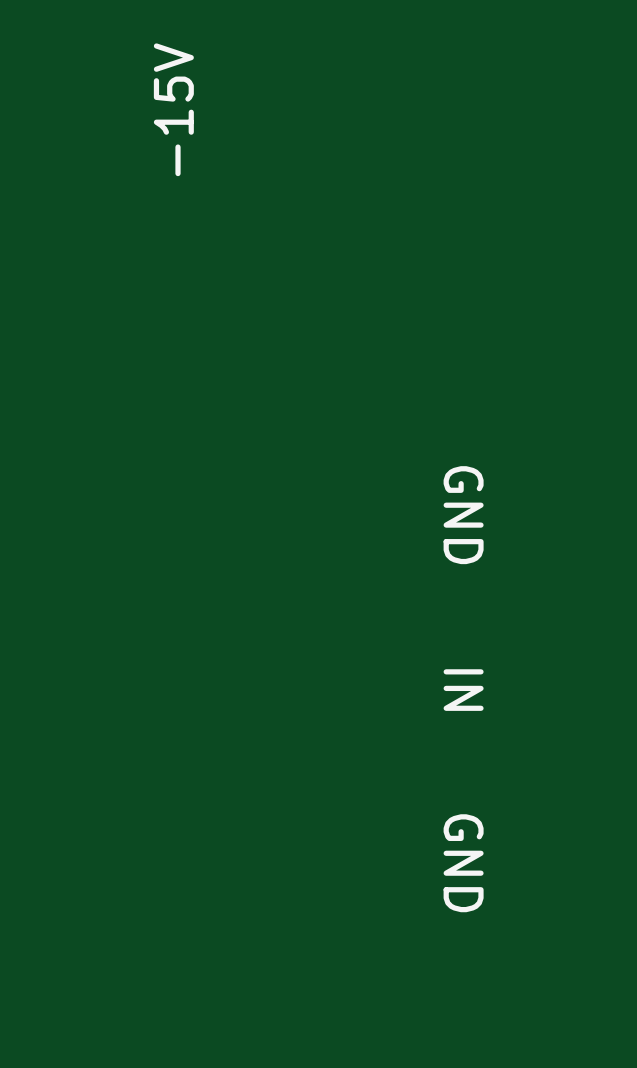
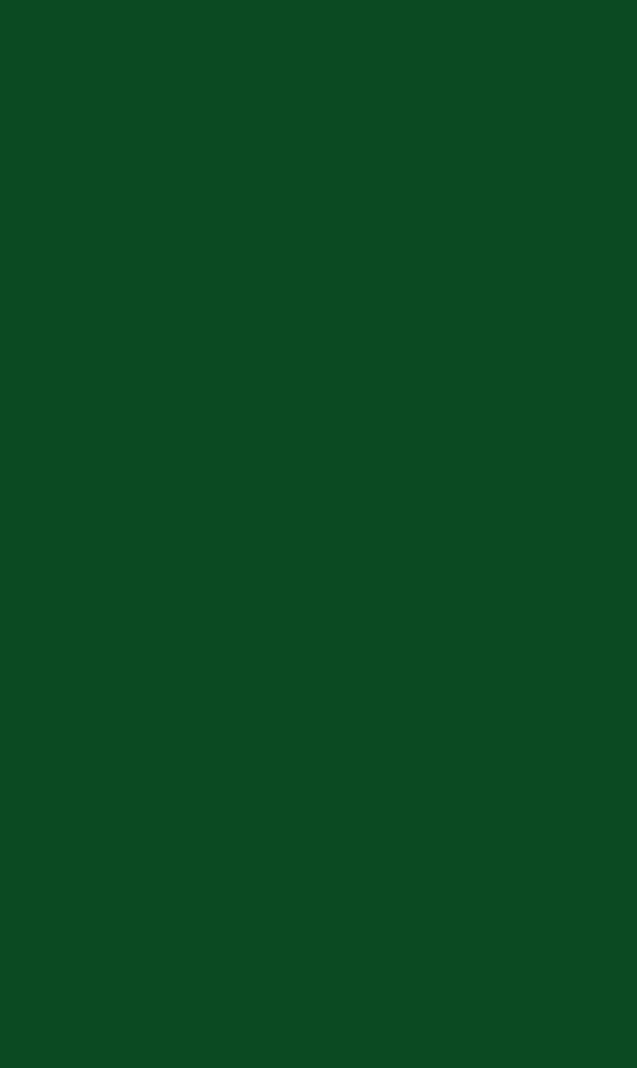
text: -15V (173, 109) -> none
text: GND (463, 515) -> none
text: IN (463, 690) -> none
text: GND (463, 863) -> none

